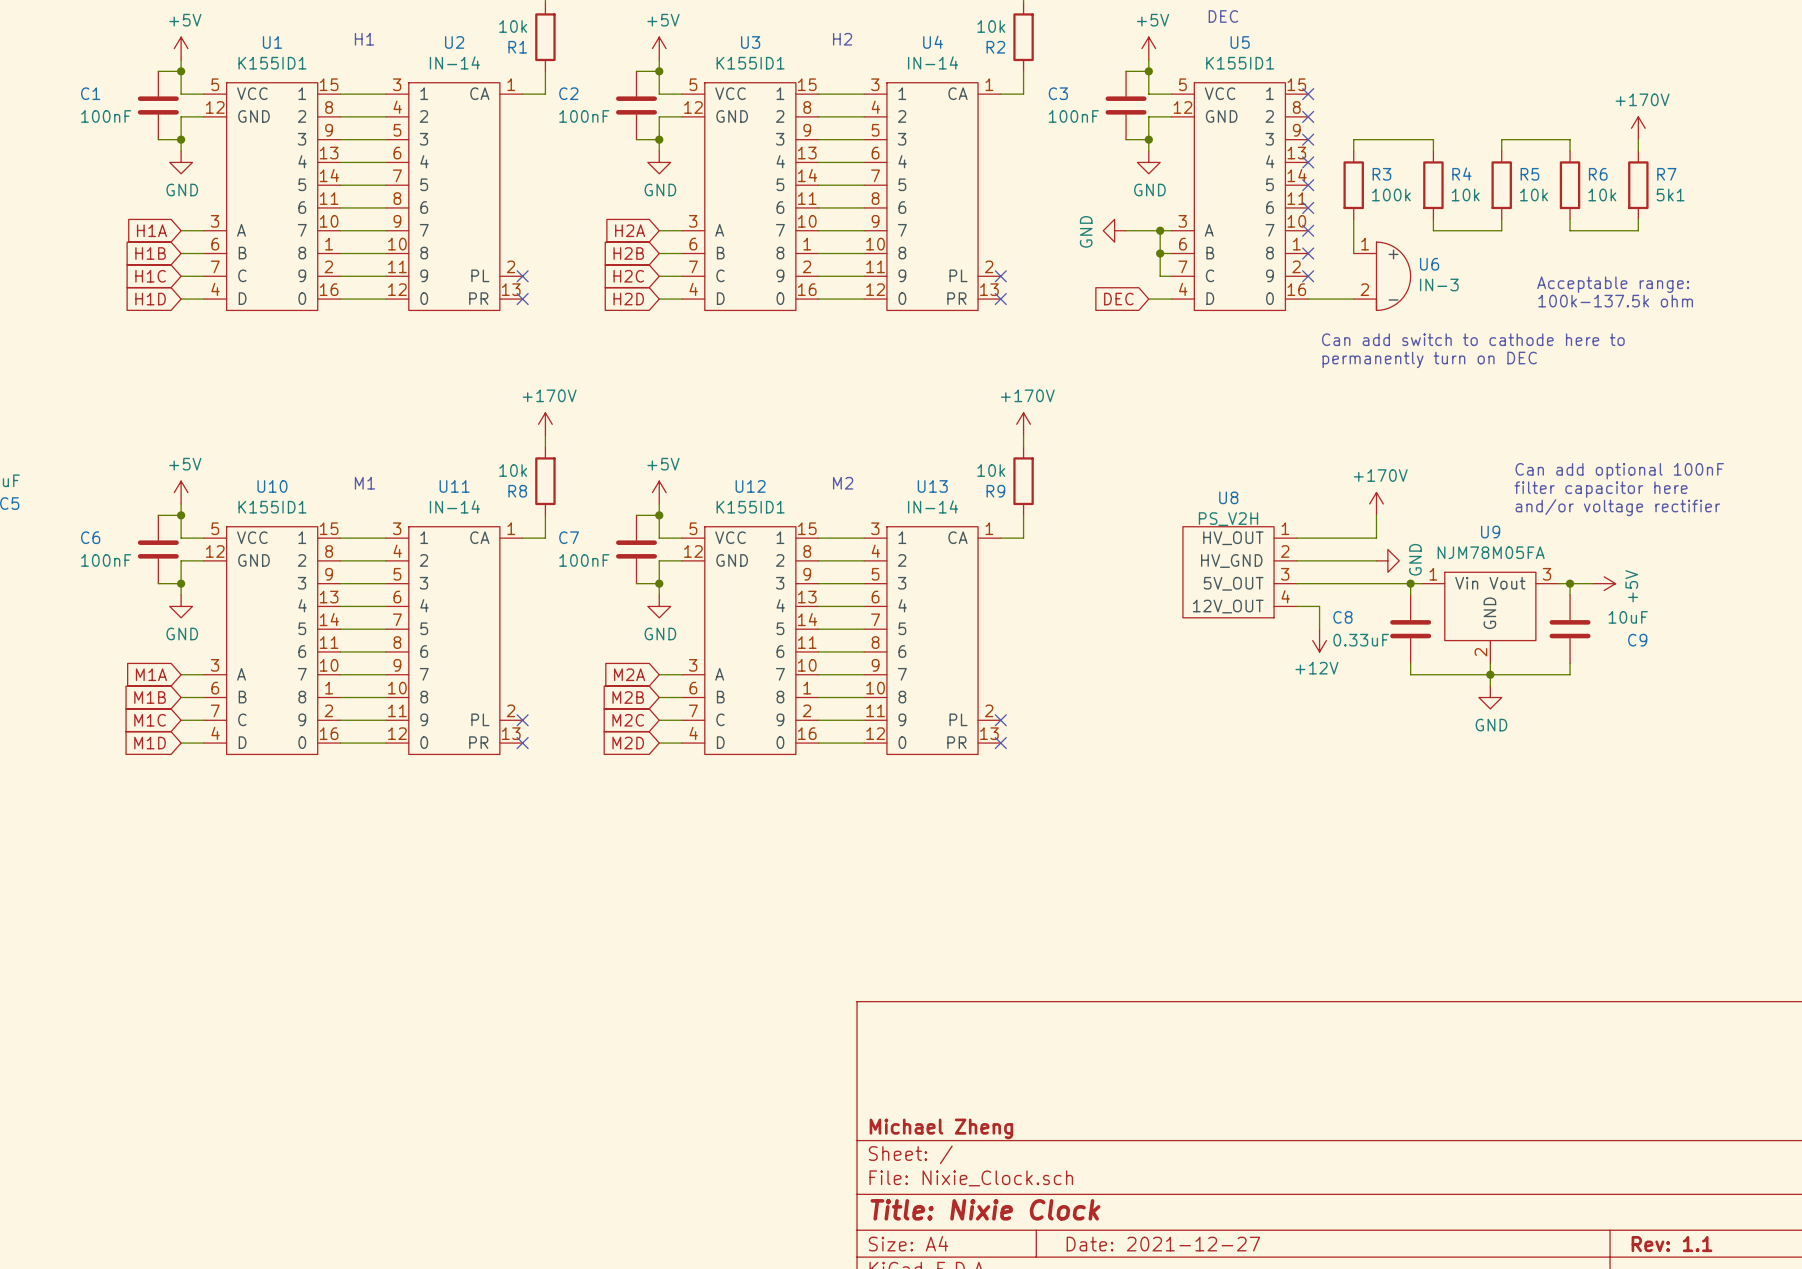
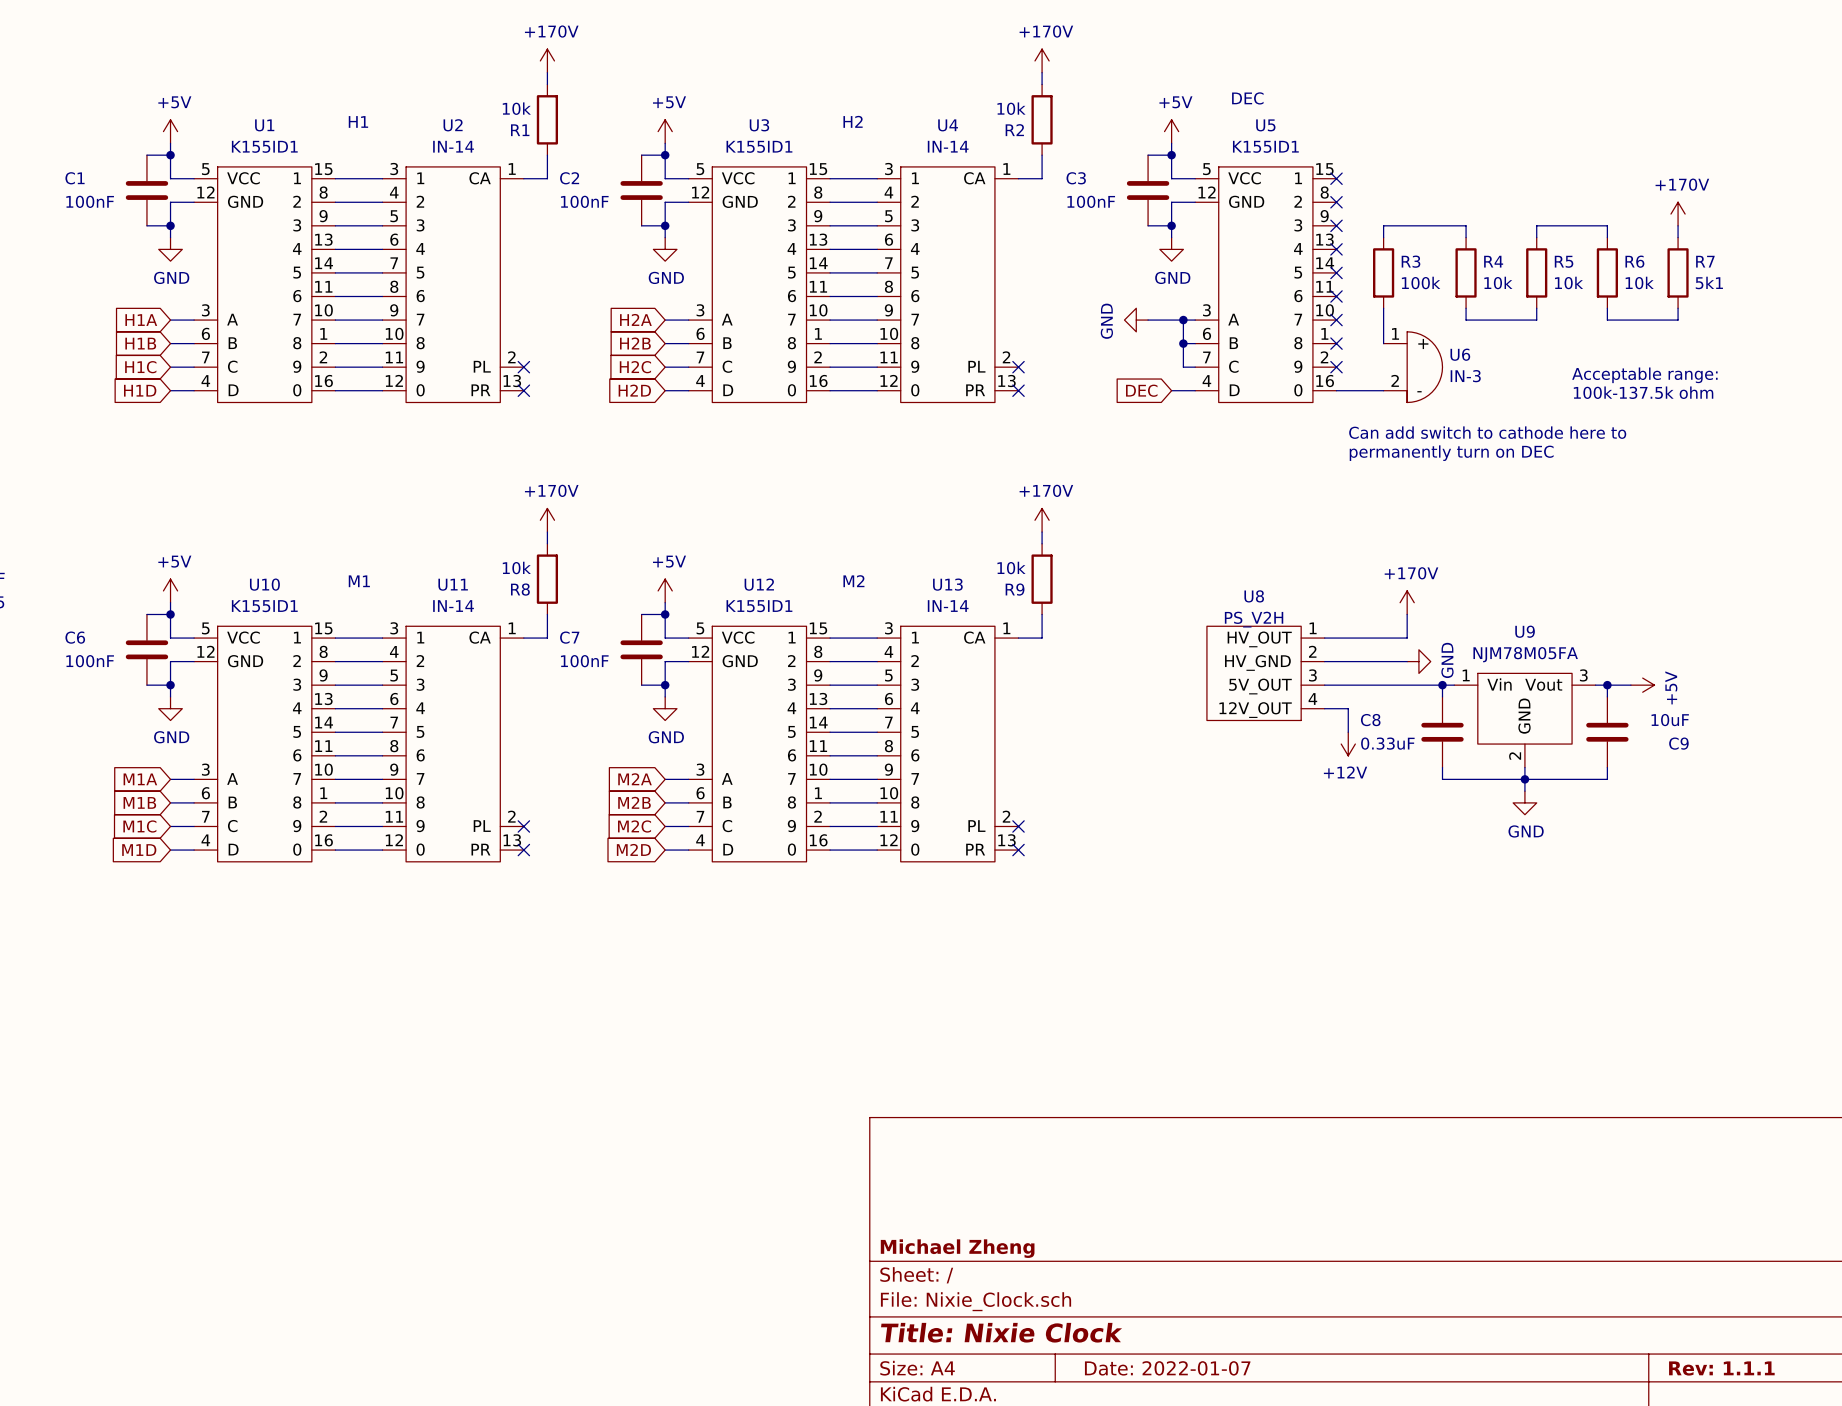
text: Can add optional 100nF (1619, 471) -> none
text: filter capacitor here (1601, 489) -> none
text: and/or voltage rectifier (1617, 507) -> none
title block: Date: 2021-12-27 (1163, 1244) -> Date: 2022-01-07 (1167, 1368)
title block: Rev: 1.1 (1671, 1244) -> Rev: 1.1.1 (1721, 1368)

